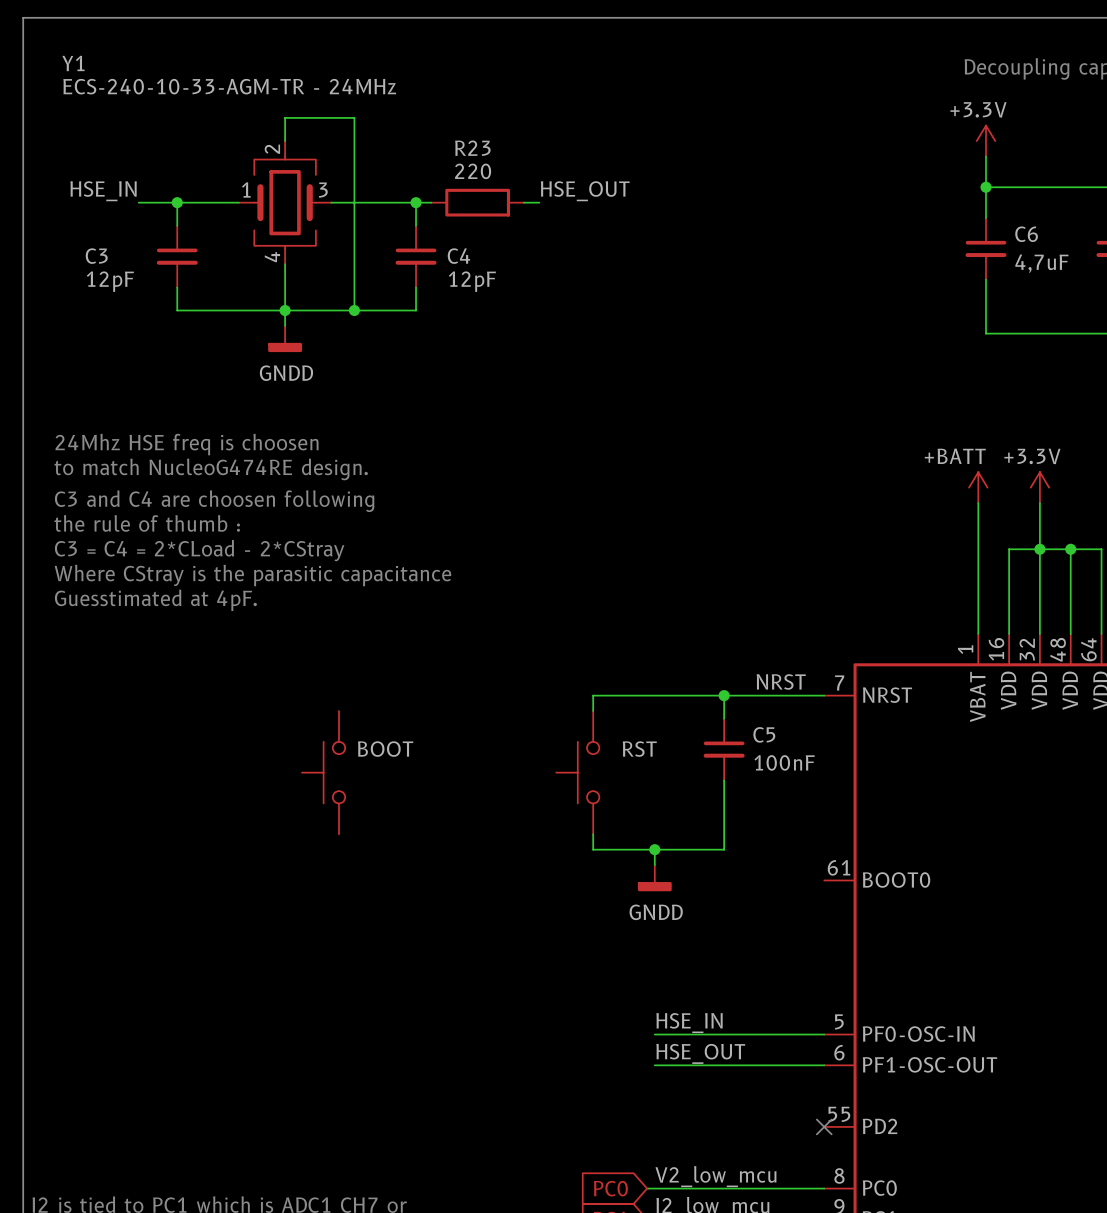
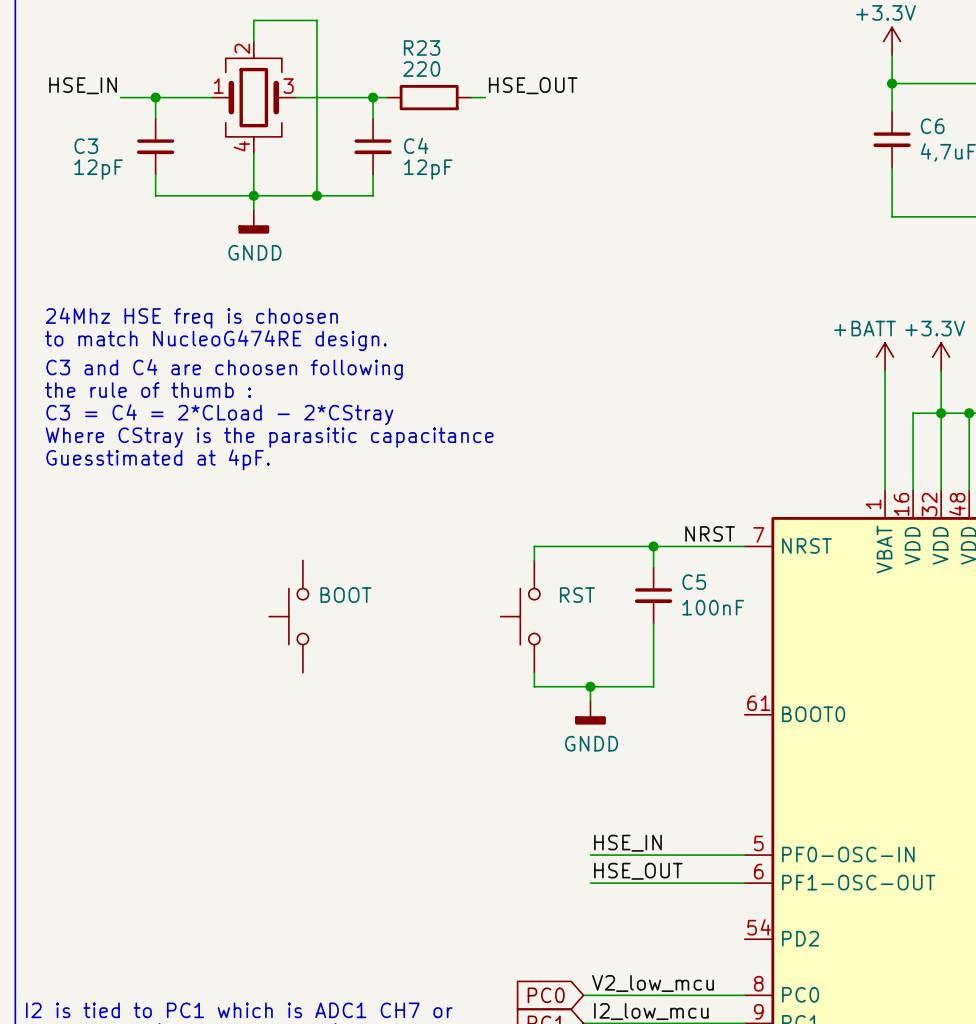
part pin number: 55 (839, 1114) -> 54 (759, 927)
no-connect mark: (824, 1126) -> none

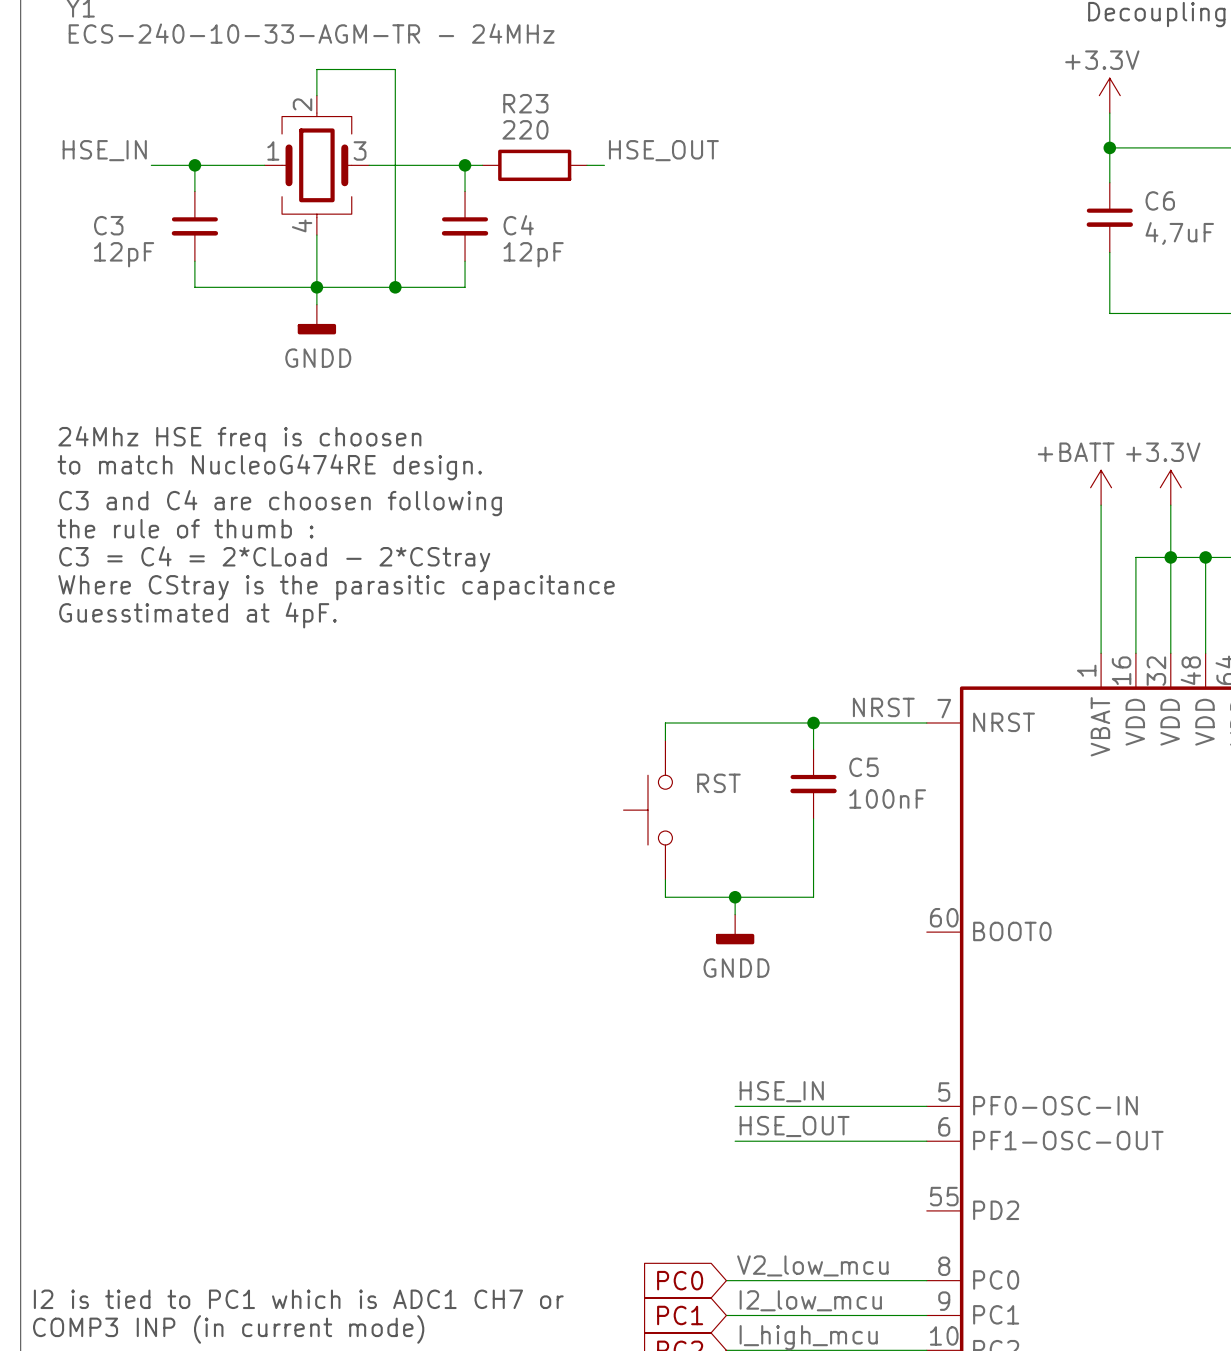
part: (288, 616) -> none
part pin number: 61 (758, 703) -> 60 (944, 917)
part pin number: 54 (759, 927) -> 55 (944, 1196)

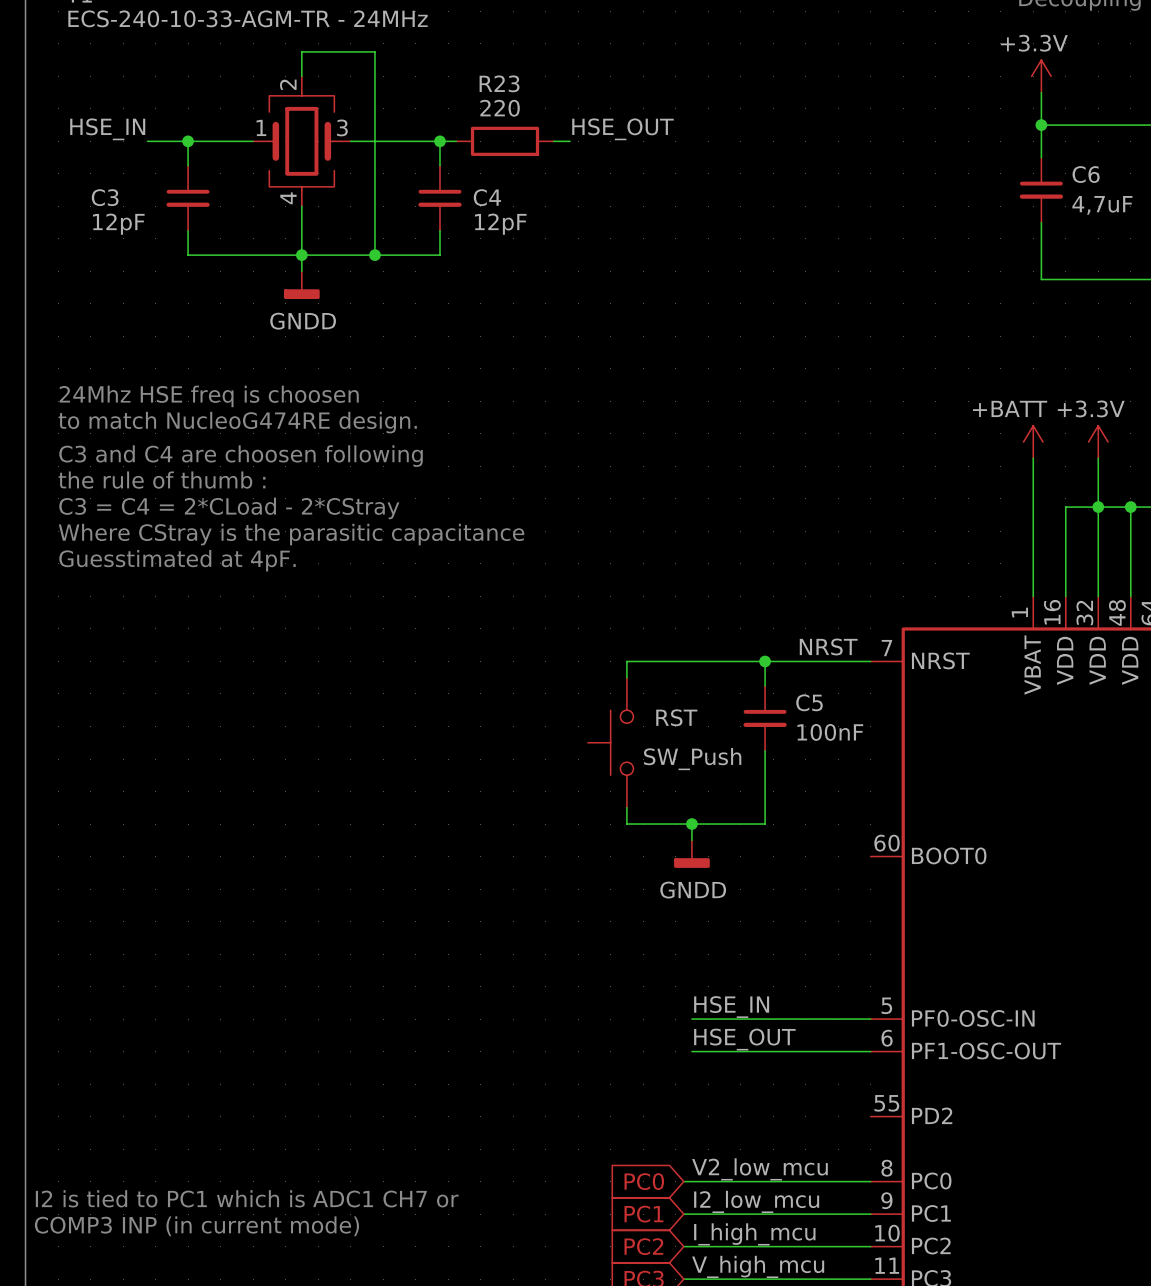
part value: none -> SW_Push (692, 759)

